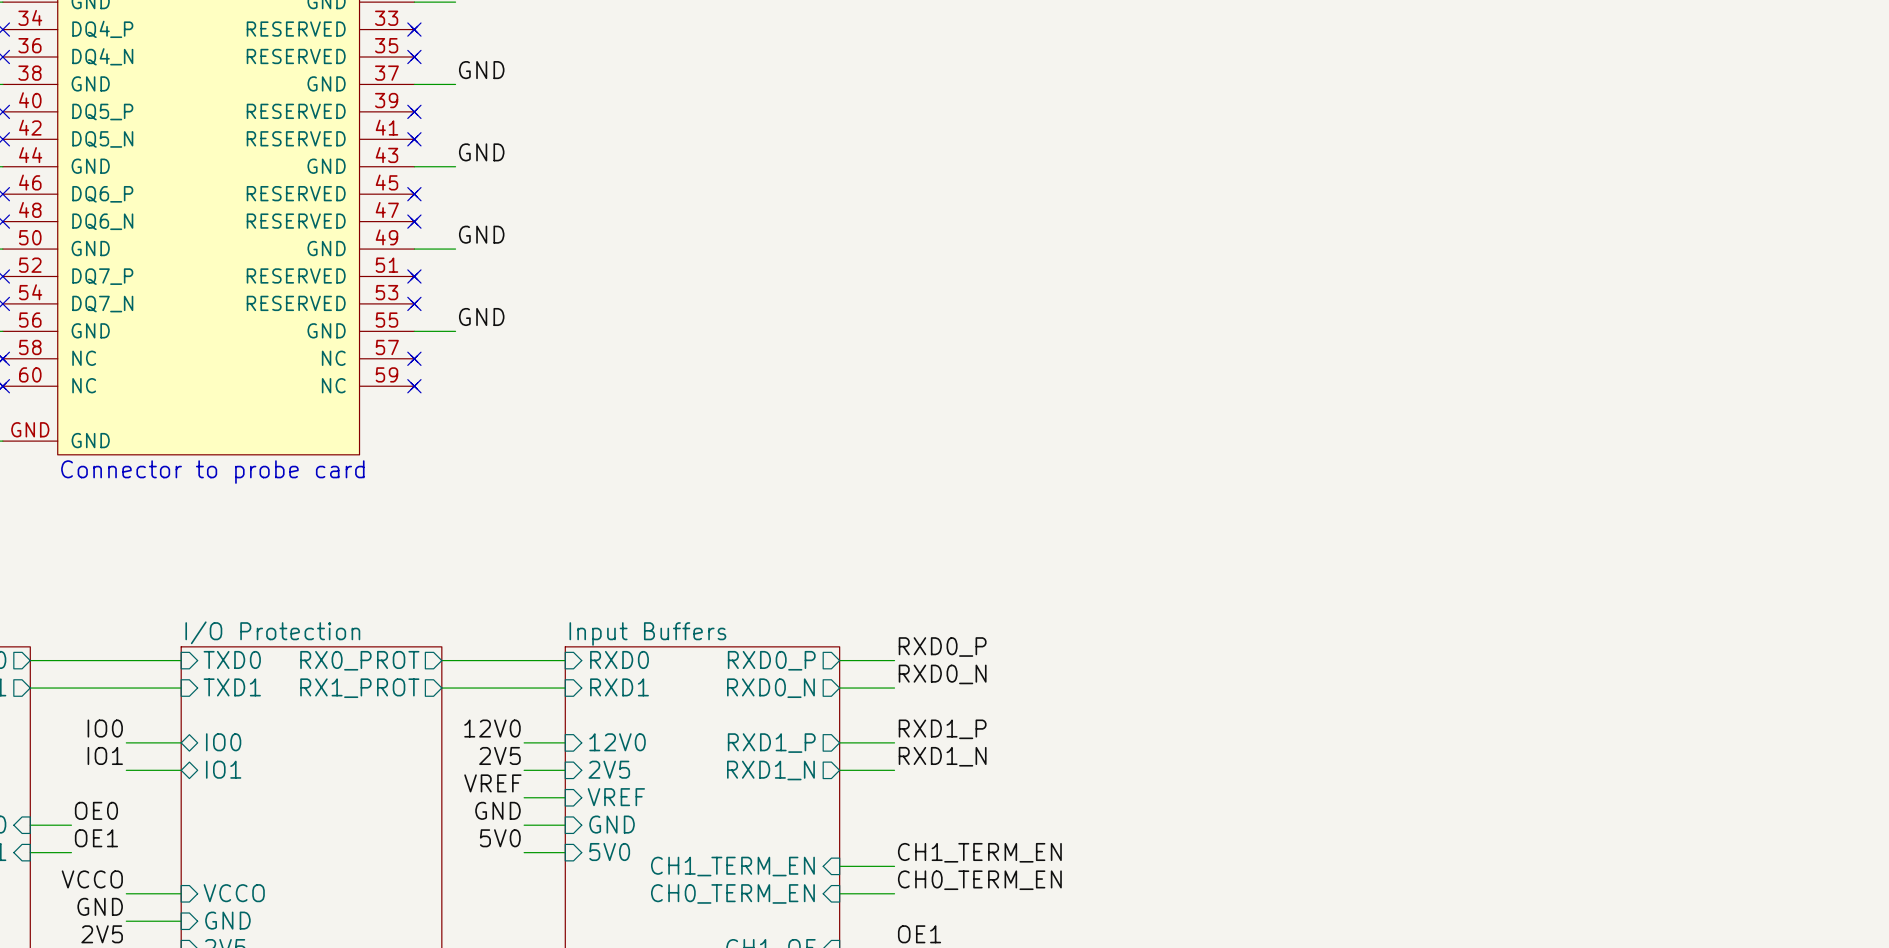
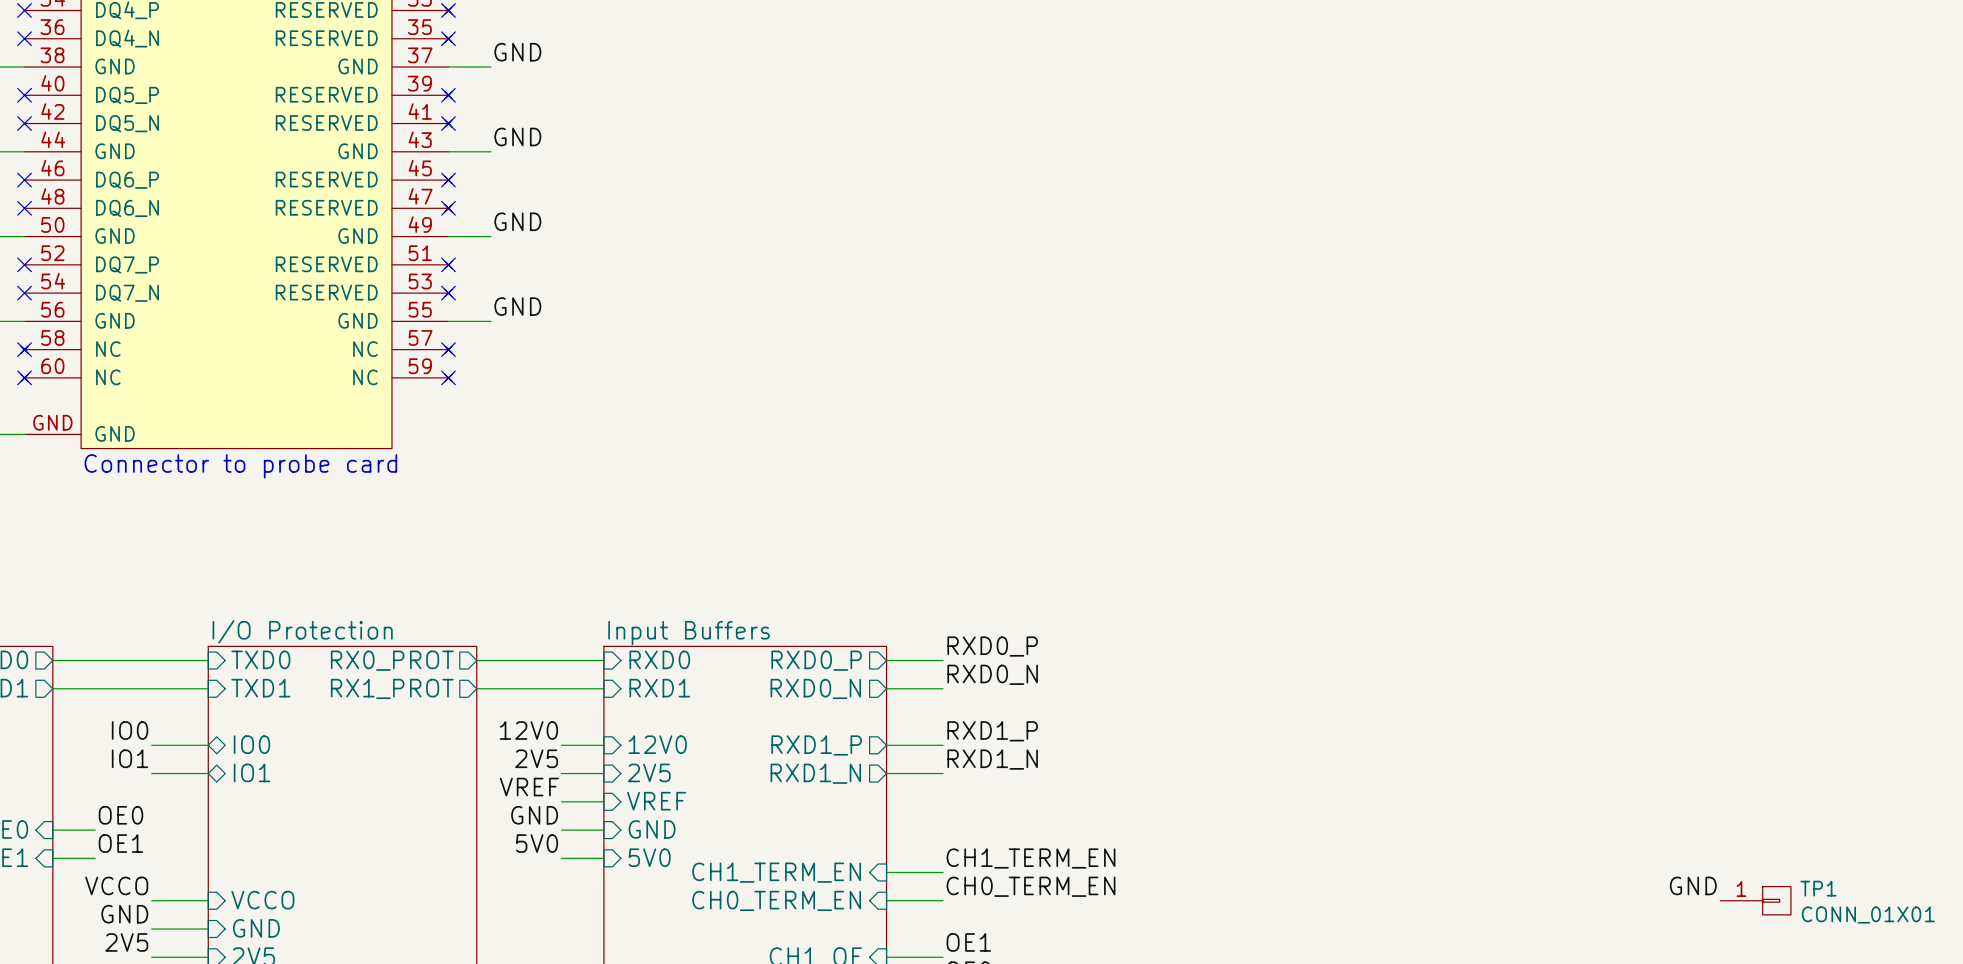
label: none -> GND (1693, 885)
TP1: none -> CONN_01X01 (1755, 900)

